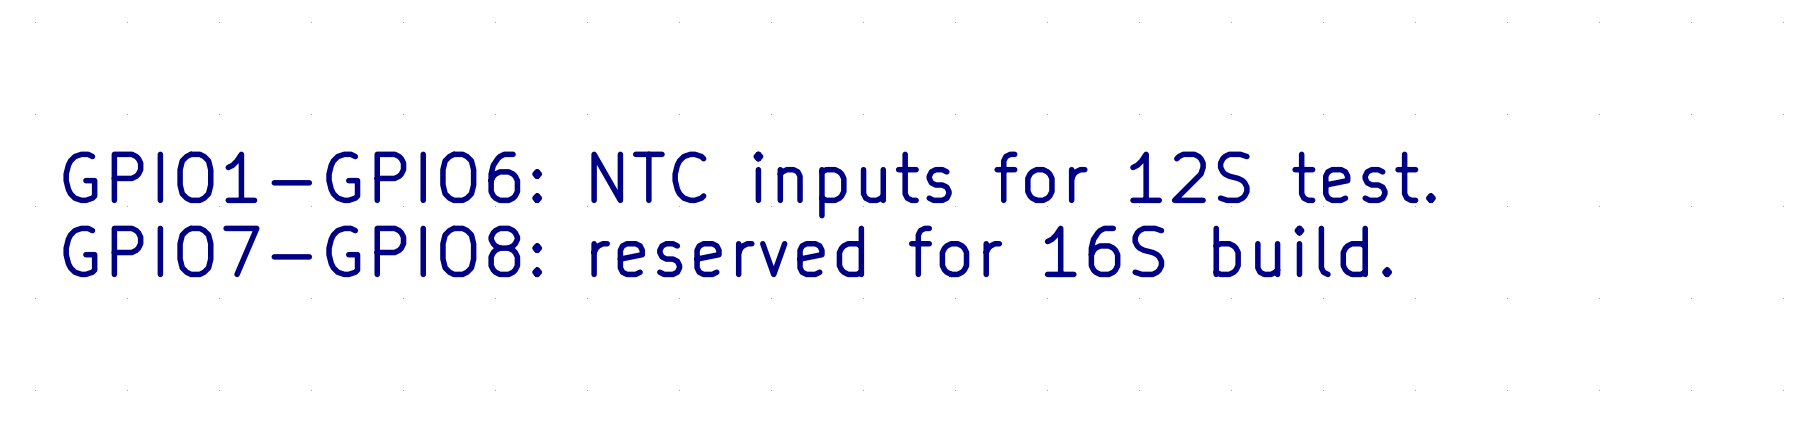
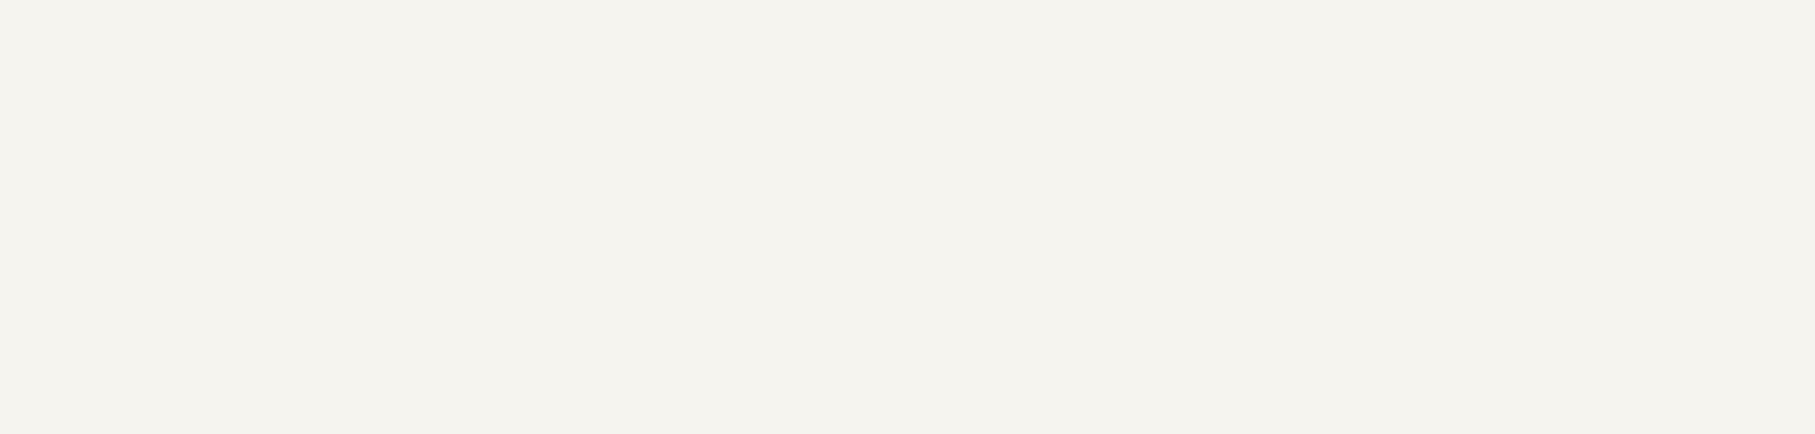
text: GPIO1-GPIO6: NTC inputs for 12S test. (749, 185) -> none
text: GPIO7-GPIO8: reserved for 16S build. (727, 251) -> none

